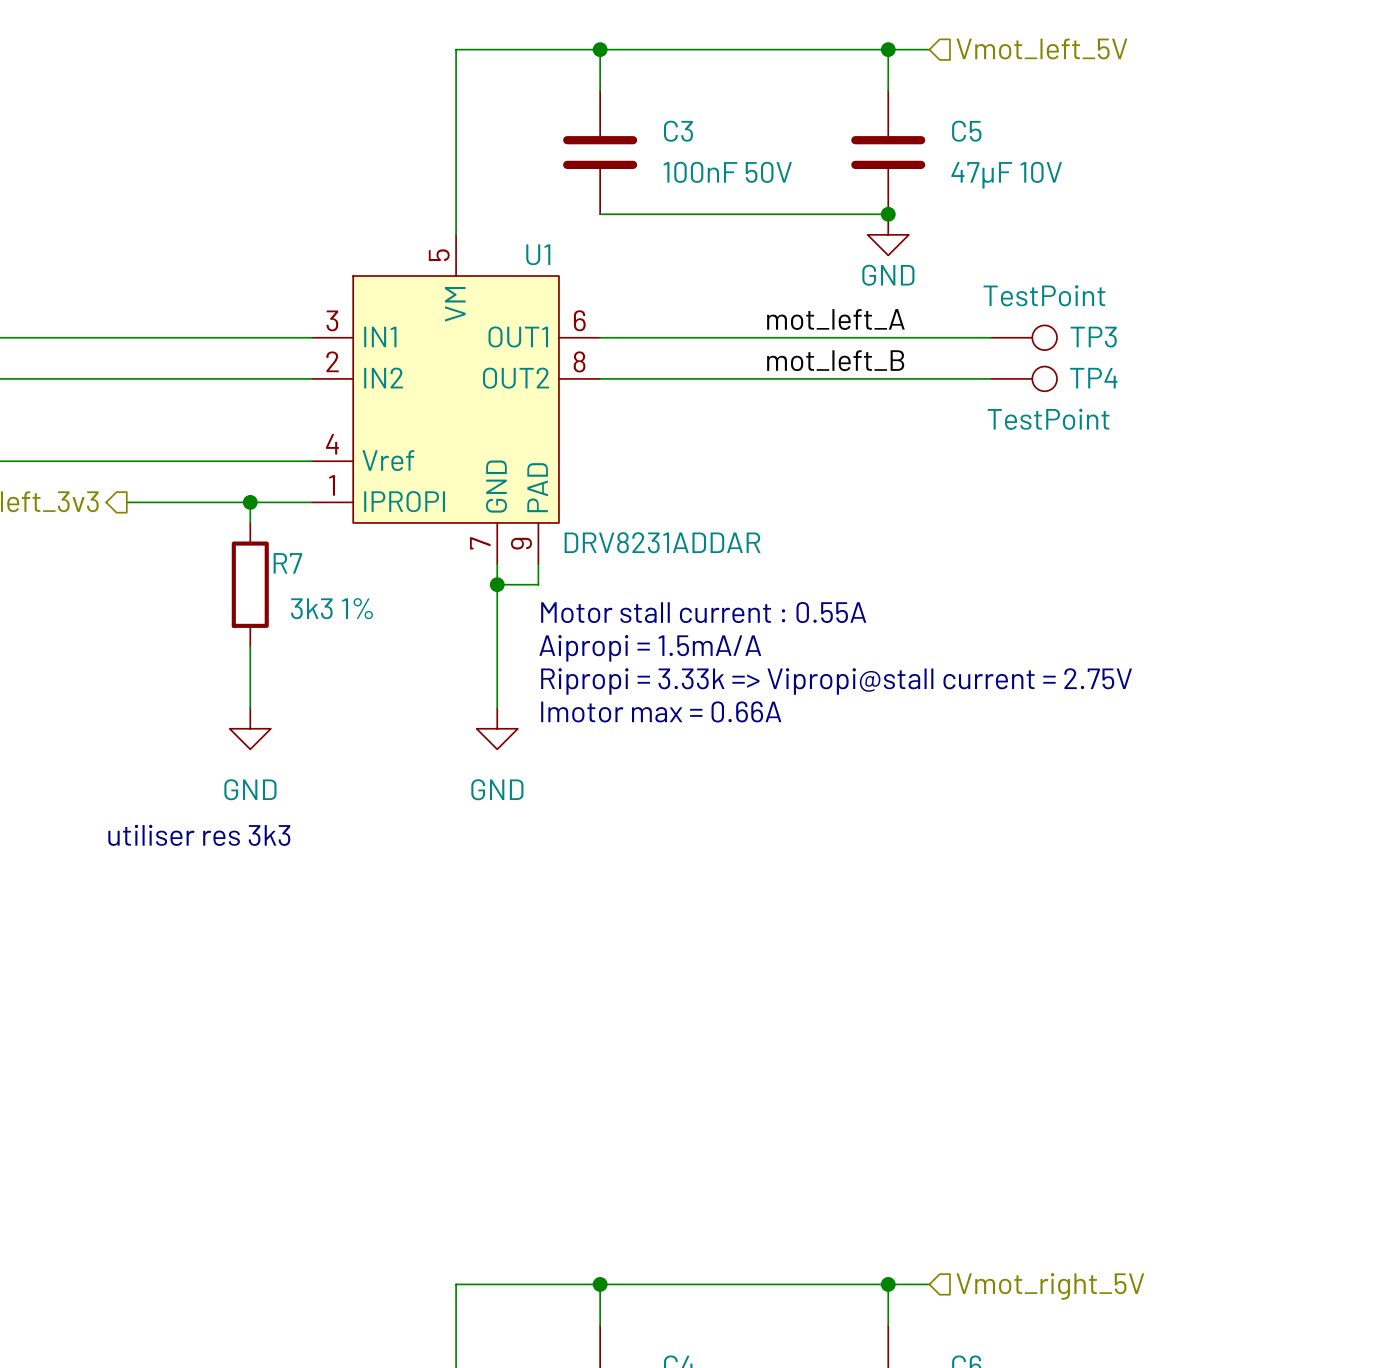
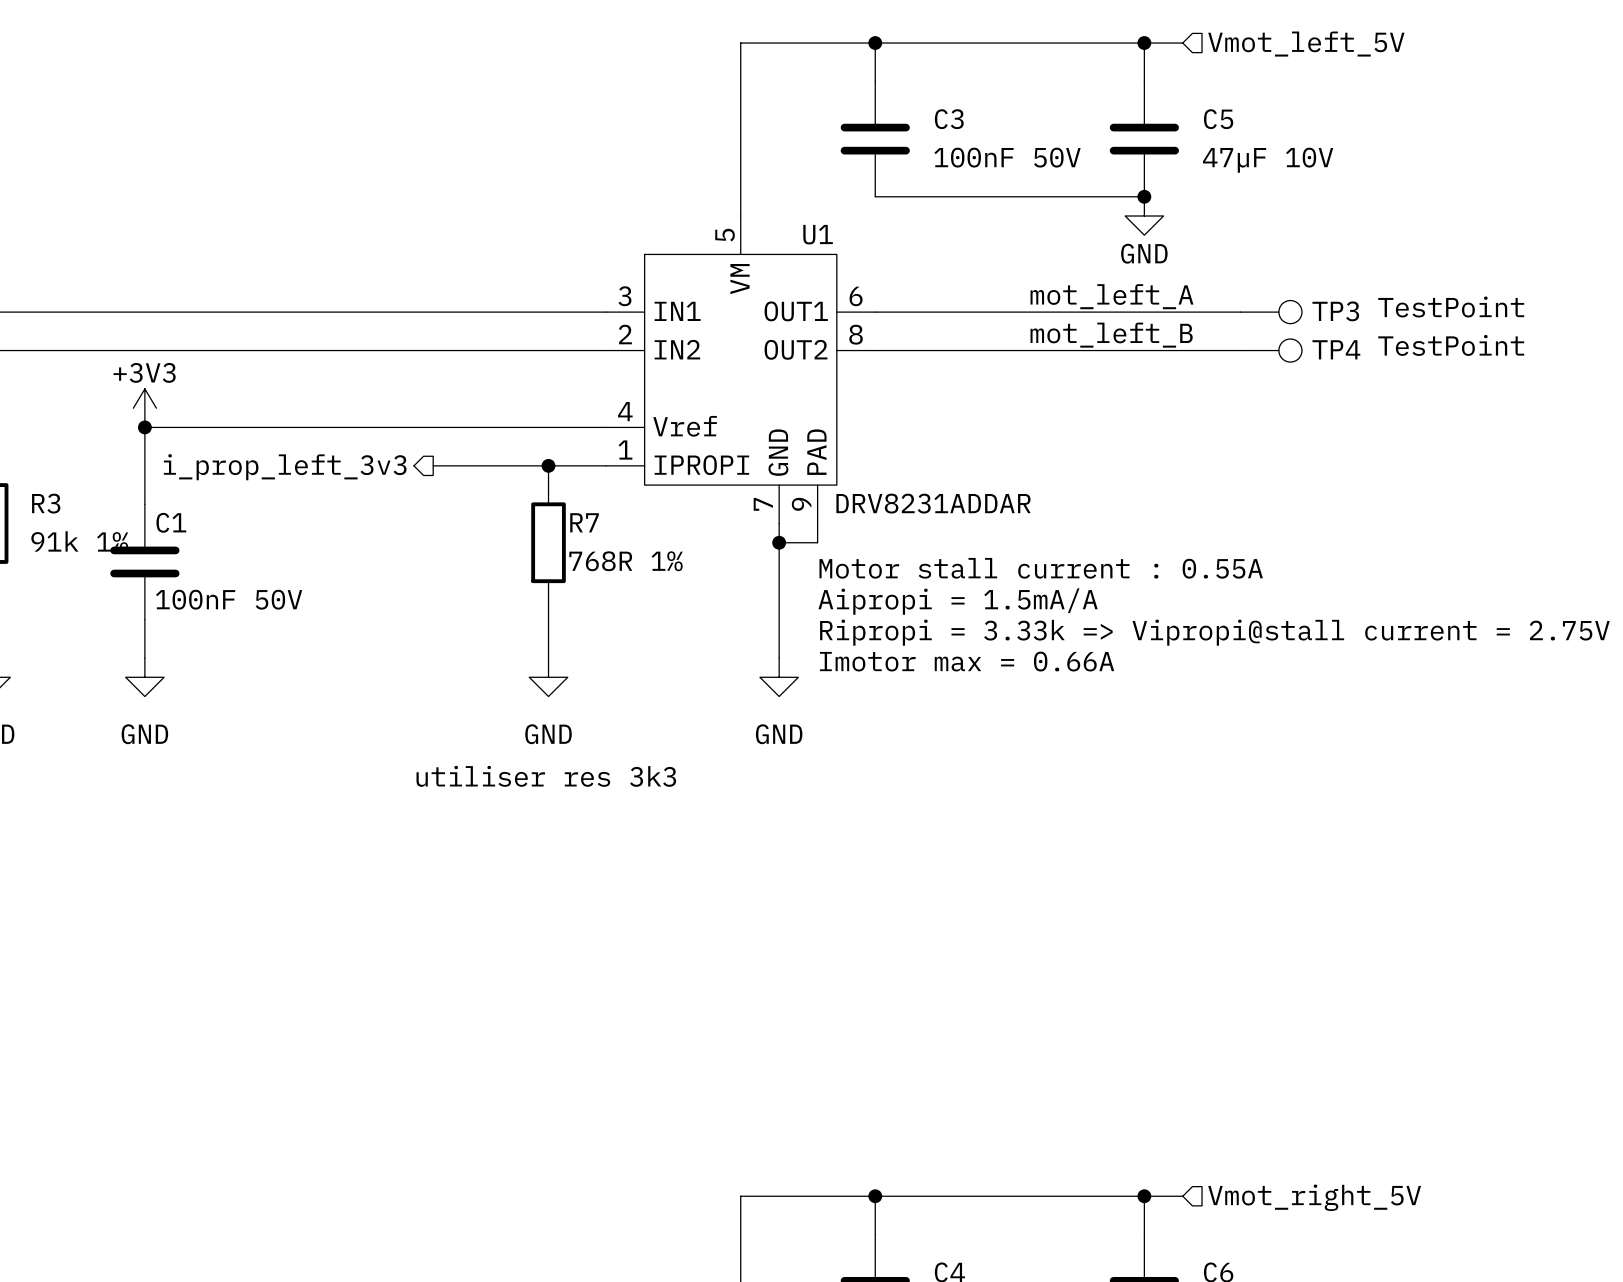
TP3 value position: TestPoint (1044, 295) -> TestPoint (1451, 307)
TP4 value position: TestPoint (1048, 419) -> TestPoint (1451, 345)
R7 value: 3k3 1% (331, 608) -> 768R 1% (626, 561)

